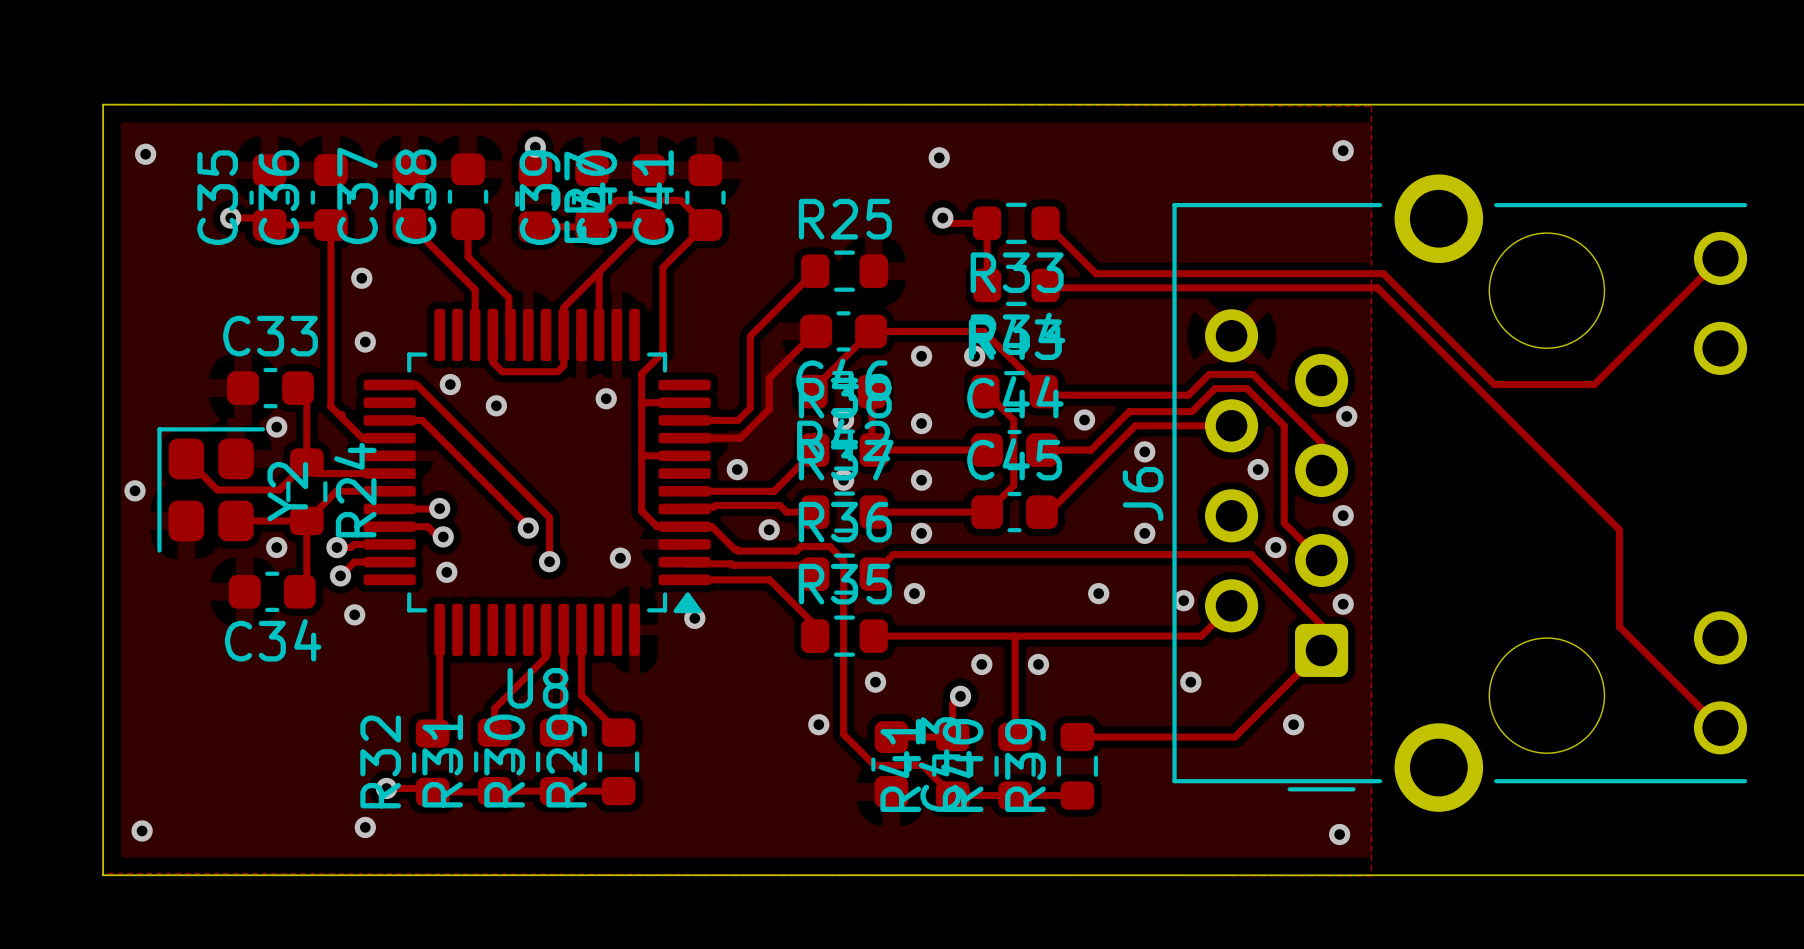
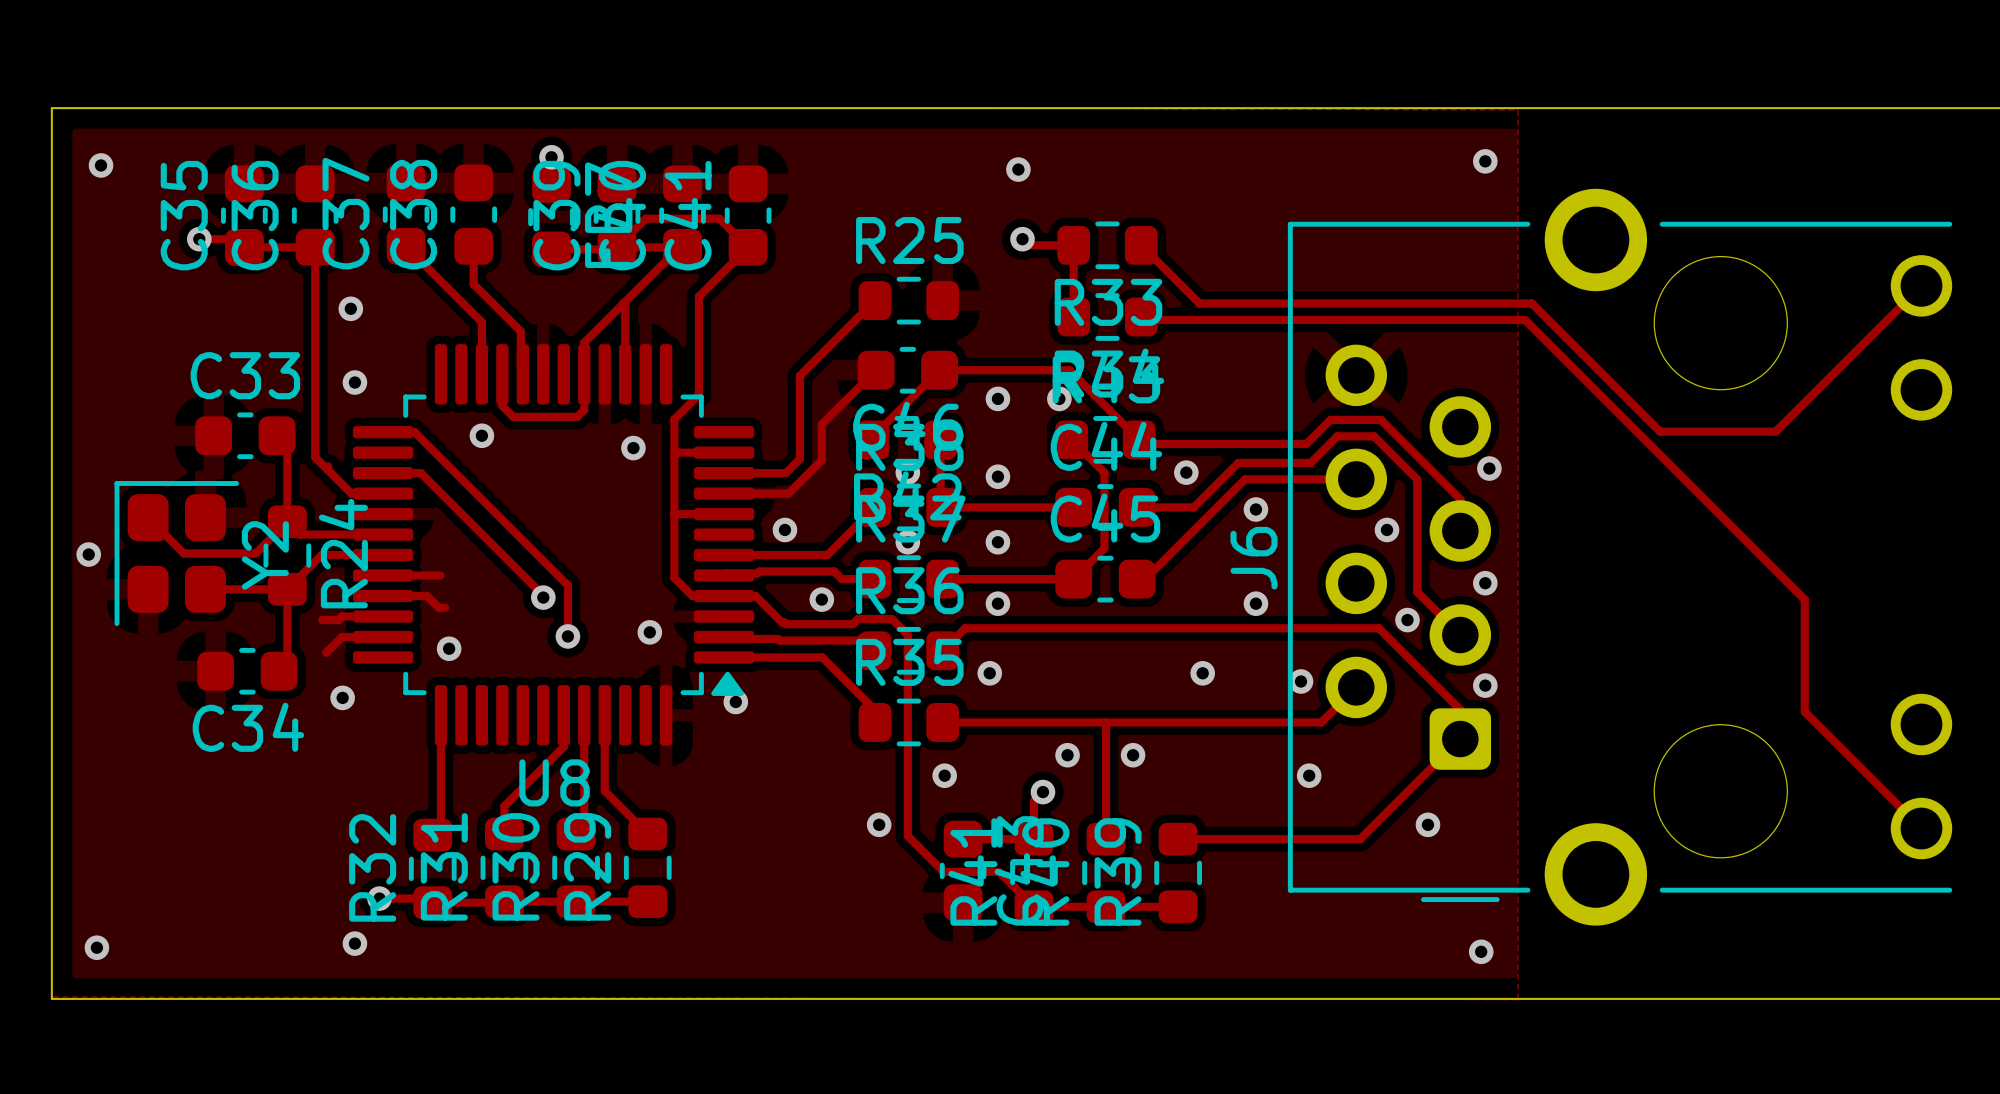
via: (450, 384) -> none
via position: (496, 405) -> (481, 435)
via: (276, 427) -> none
via: (439, 508) -> none
via: (443, 536) -> none
via: (276, 547) -> none
via: (336, 547) -> none
via: (340, 575) -> none

